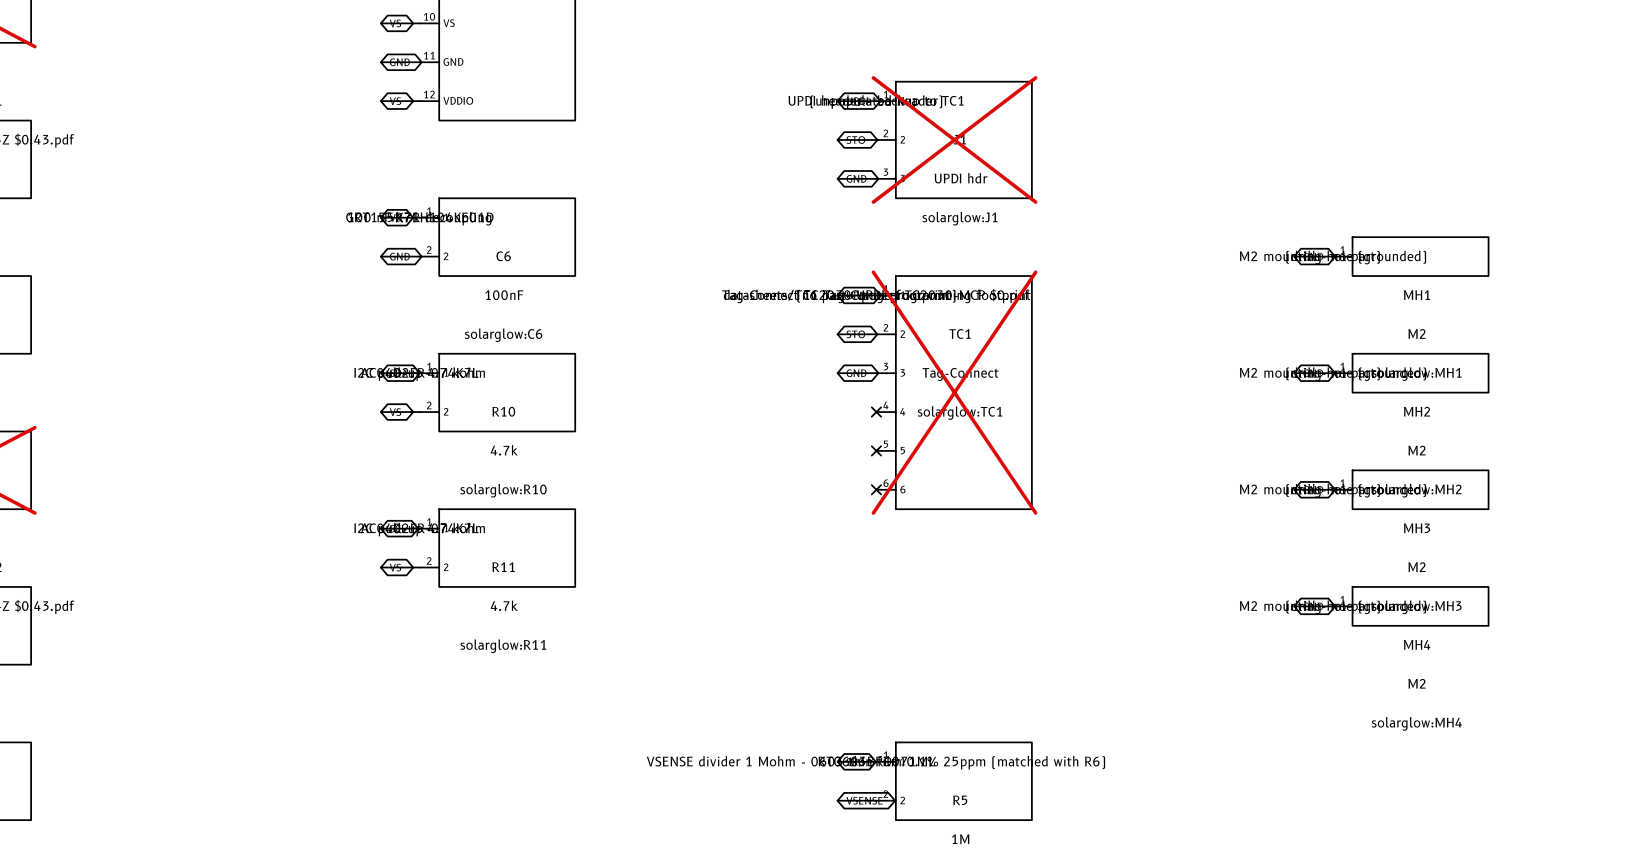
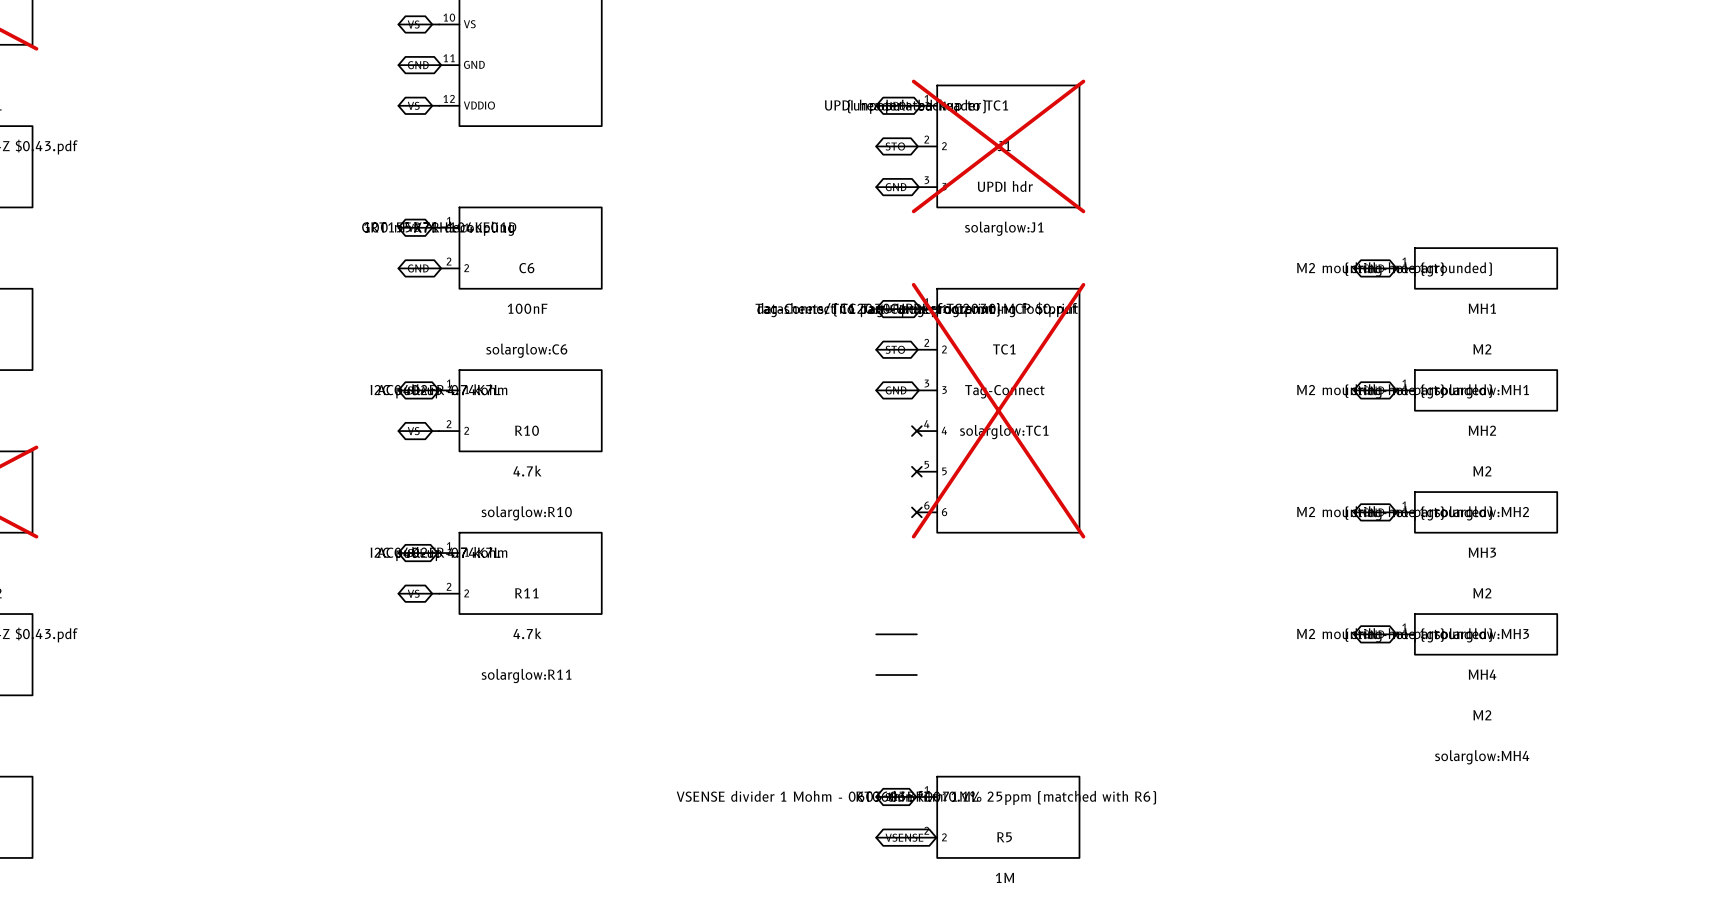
wire: none -> (876, 634) (916, 634)
wire: none -> (876, 675) (916, 675)

